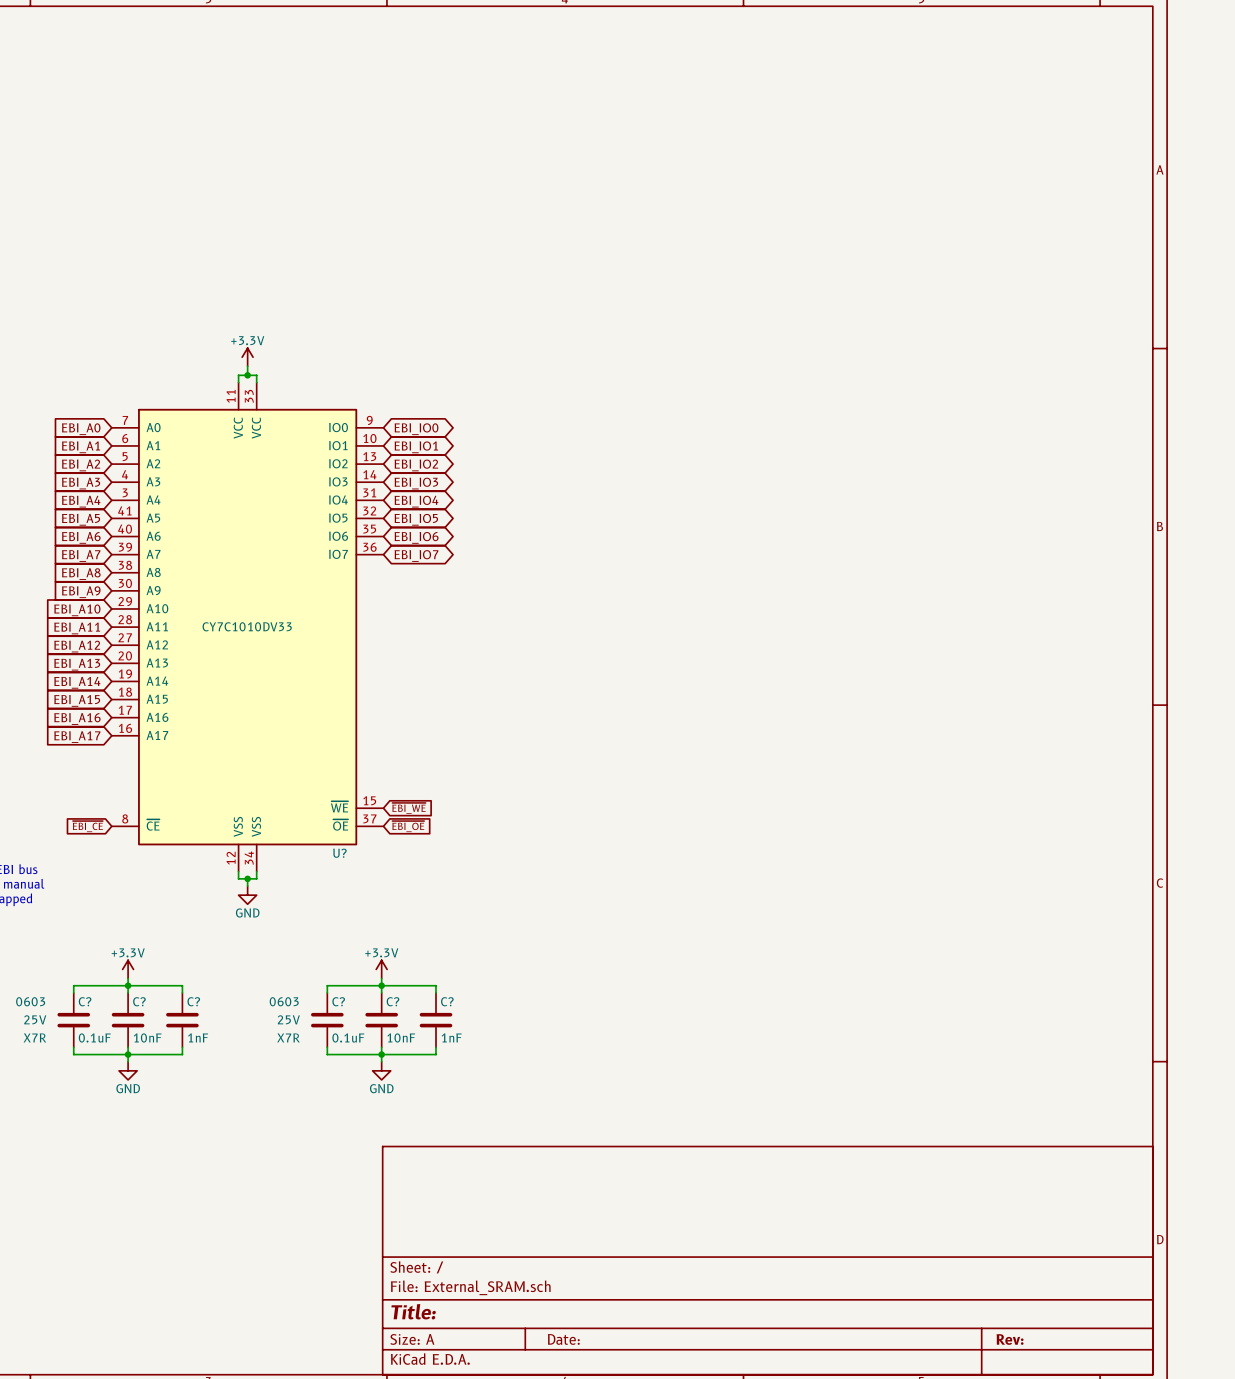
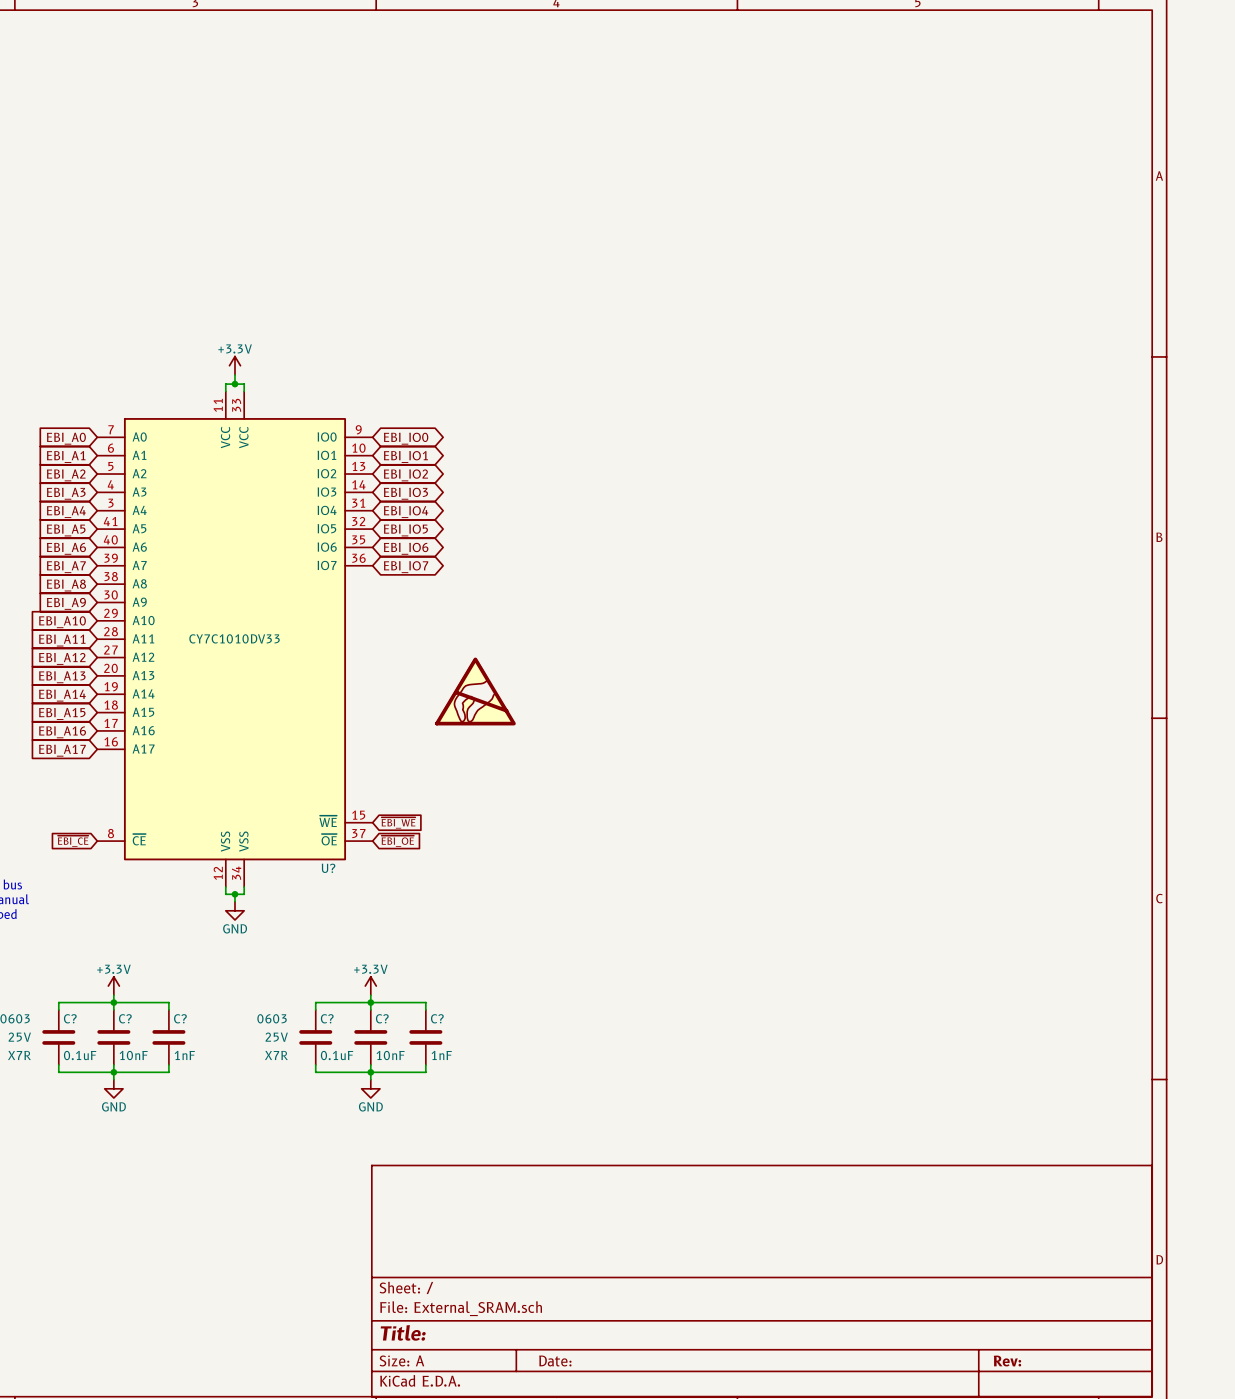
power symbol: none -> (475, 691)

